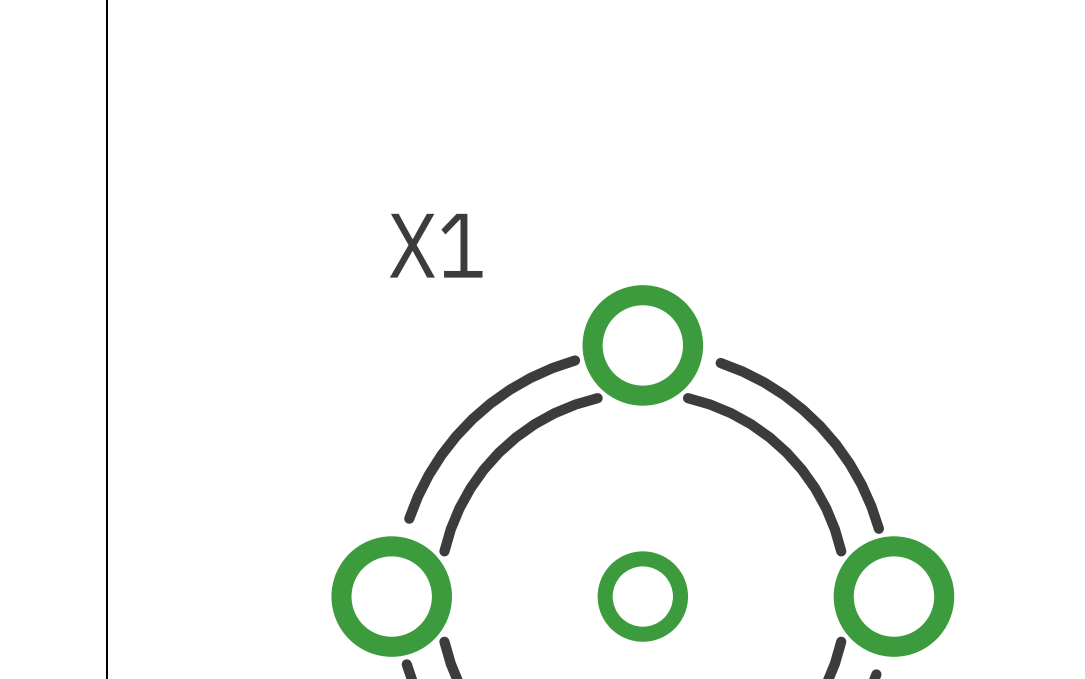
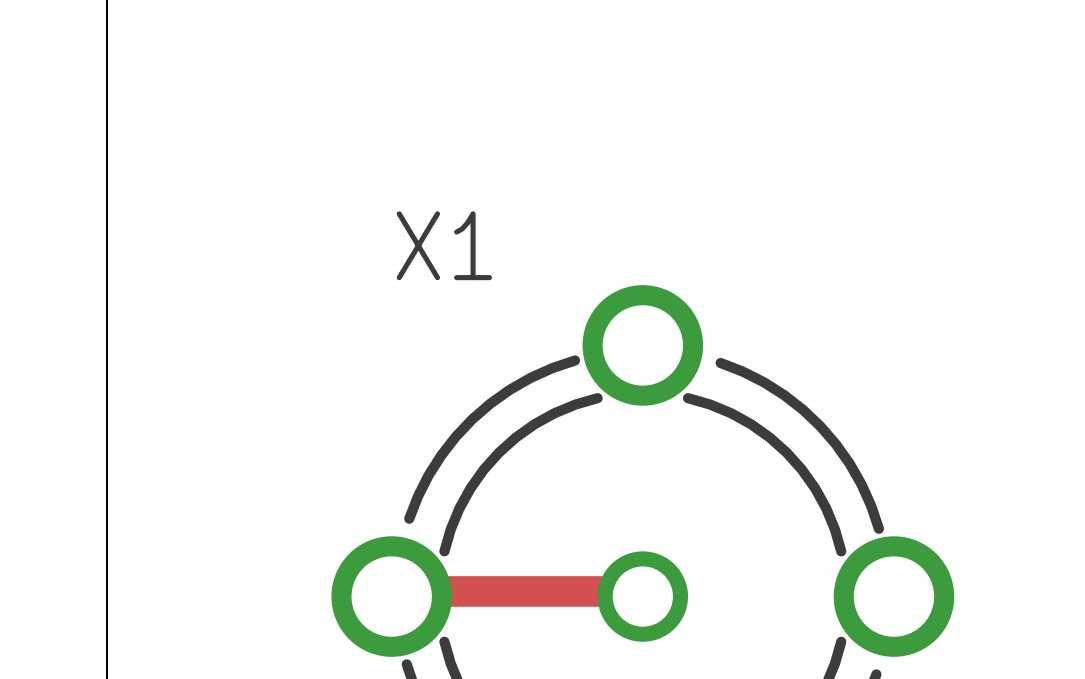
track: none -> (391, 596) (392, 591) (637, 591) (642, 596)

